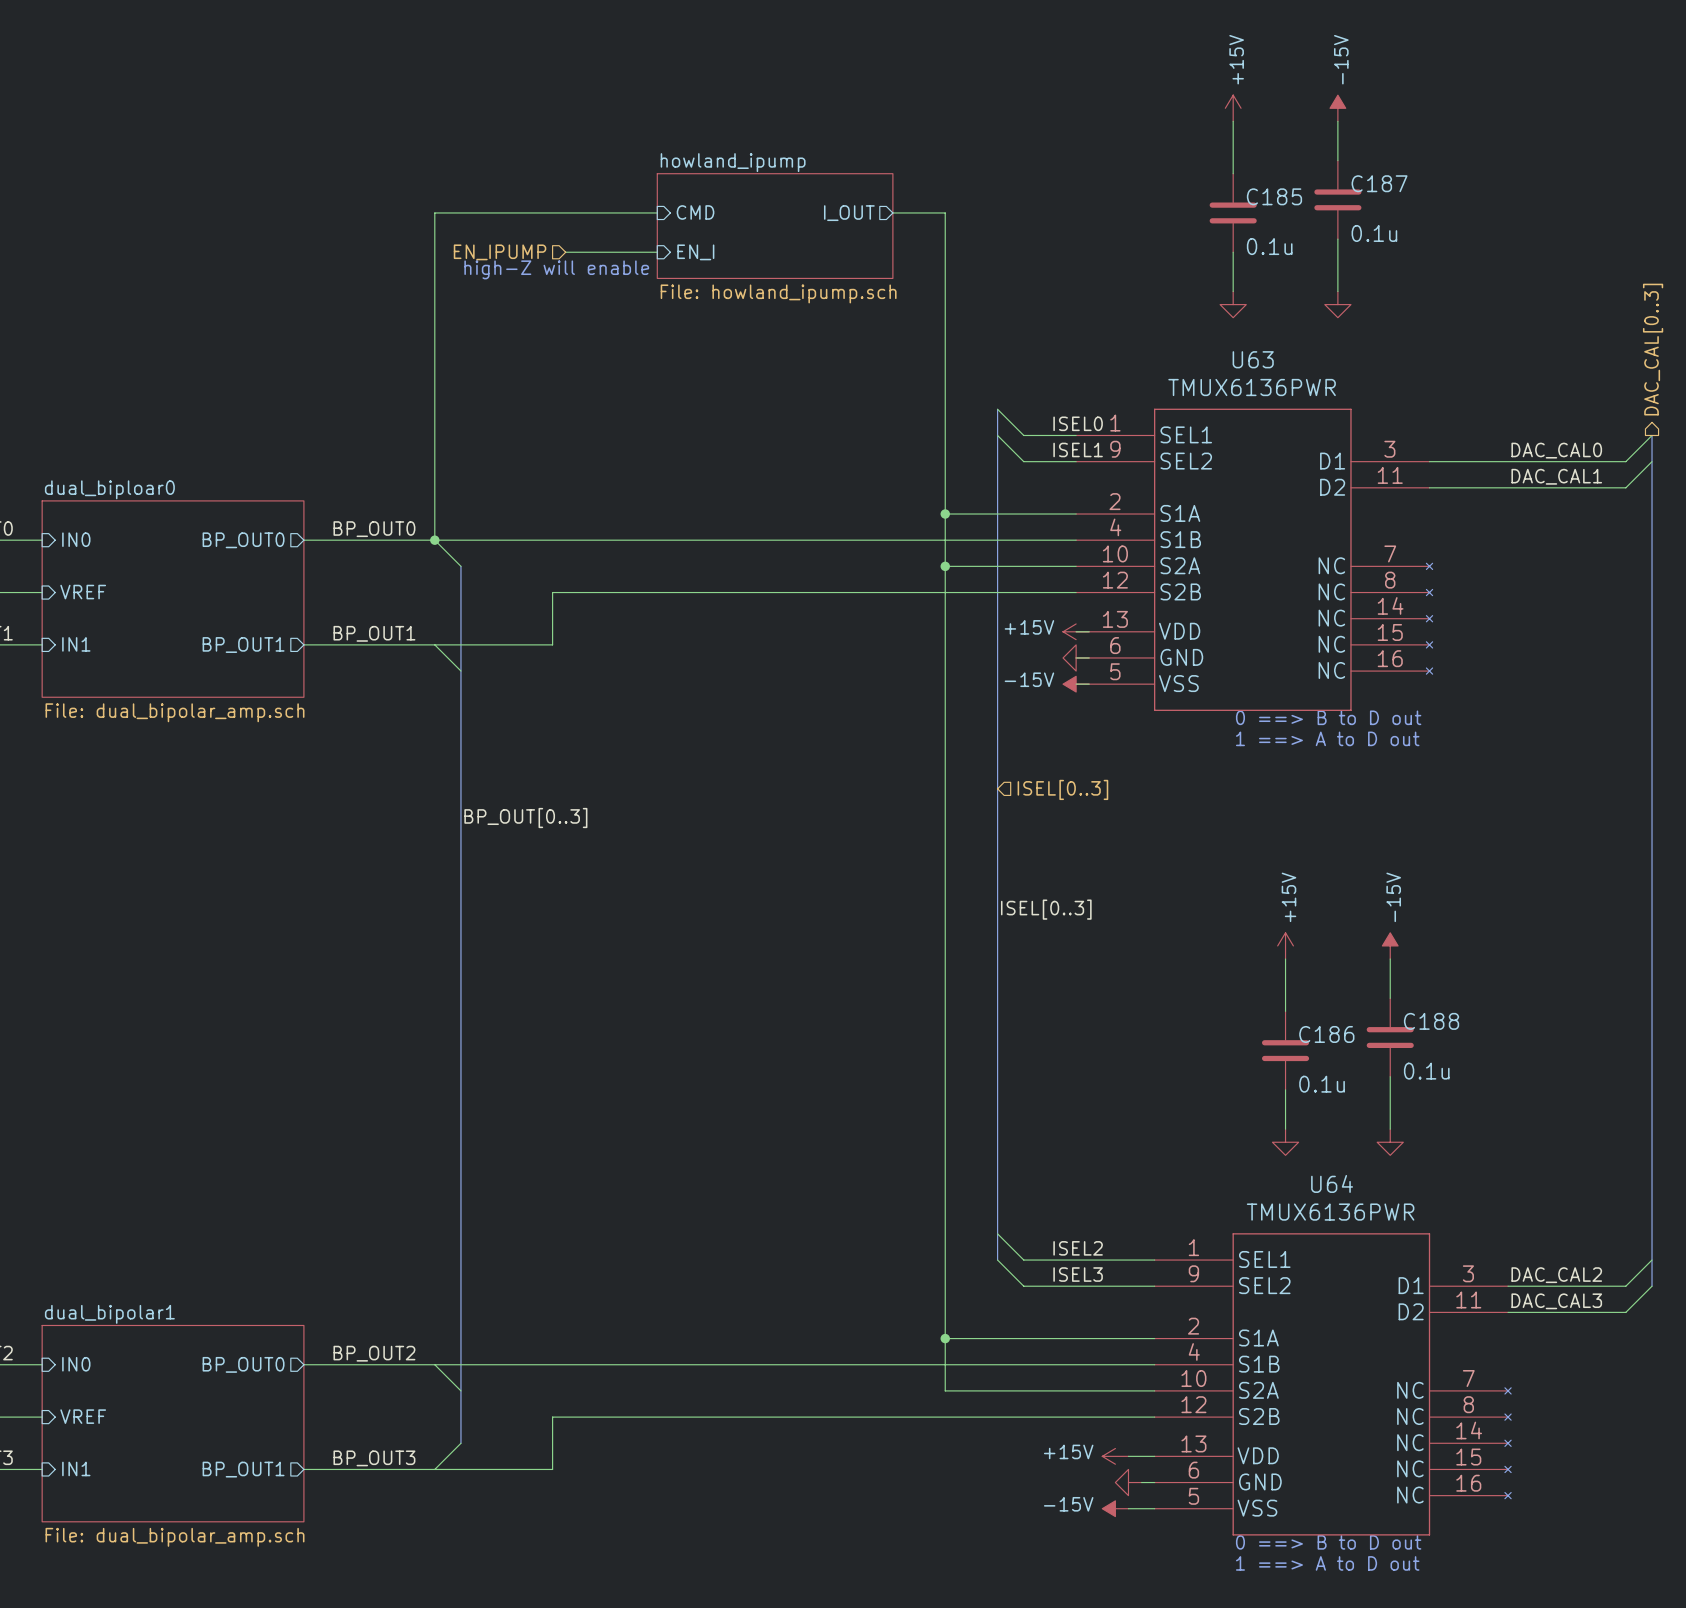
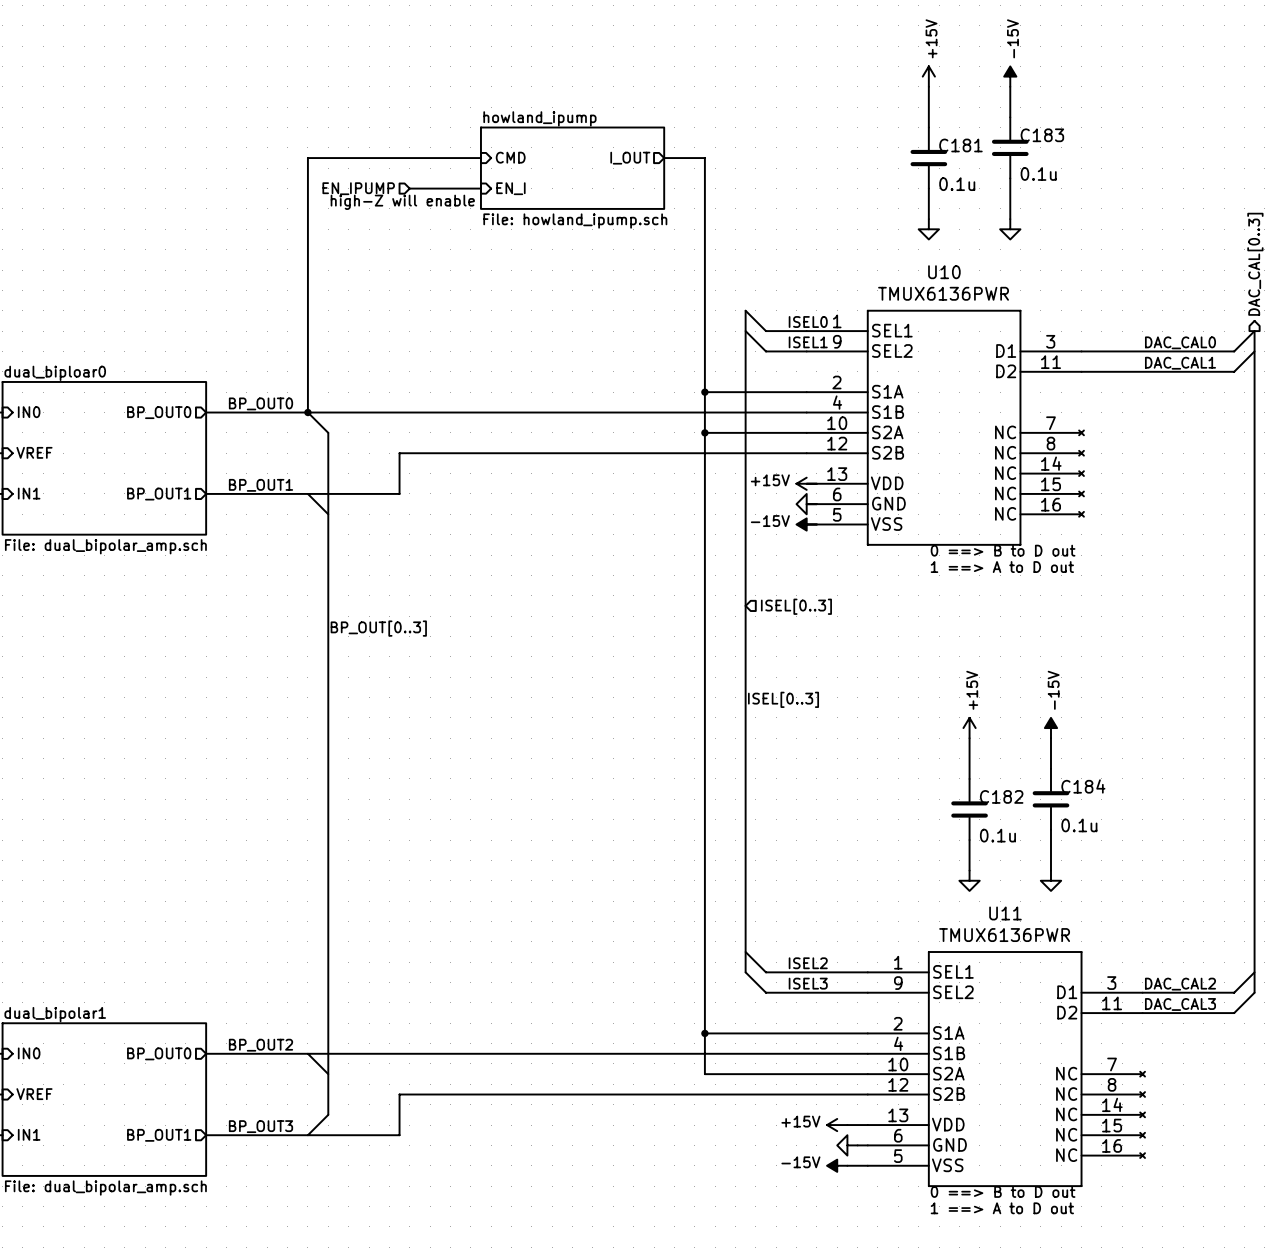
C187 name: C187 (1379, 183) -> C183 (1042, 135)
C185 name: C185 (1274, 196) -> C181 (960, 145)
U63 name: U63 (1253, 359) -> U10 (944, 272)
C188 name: C188 (1431, 1021) -> C184 (1083, 786)
C186 name: C186 (1326, 1034) -> C182 (1001, 796)
U64 name: U64 (1332, 1183) -> U11 (1005, 913)

